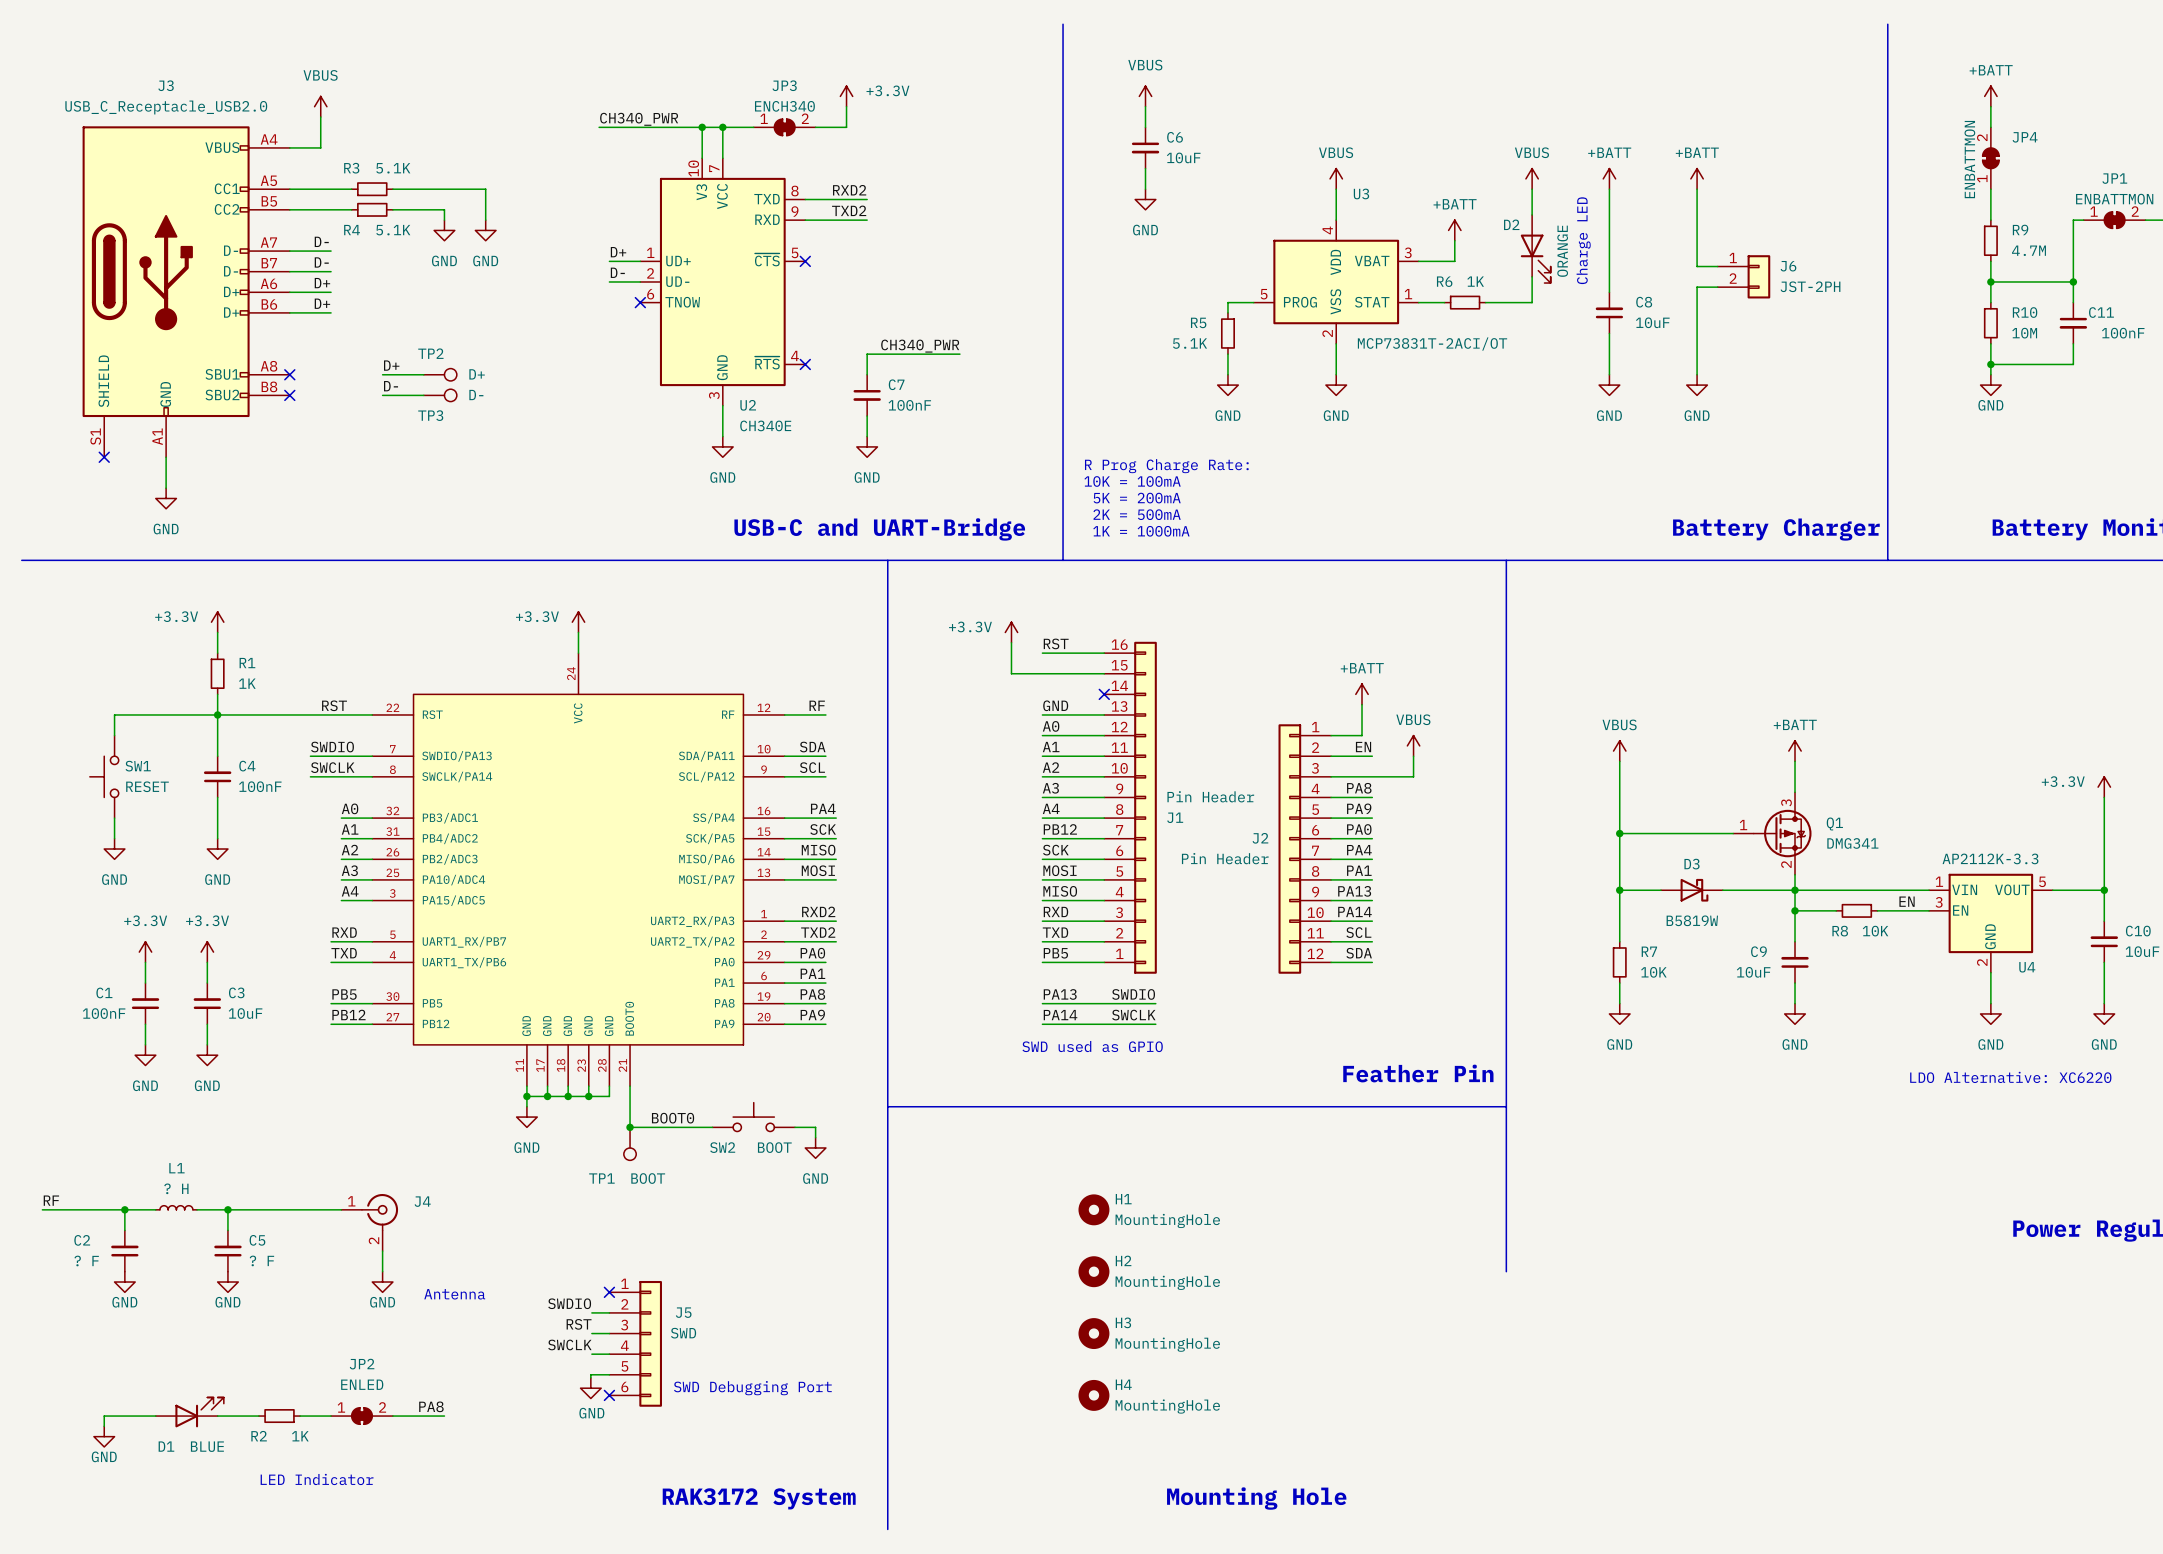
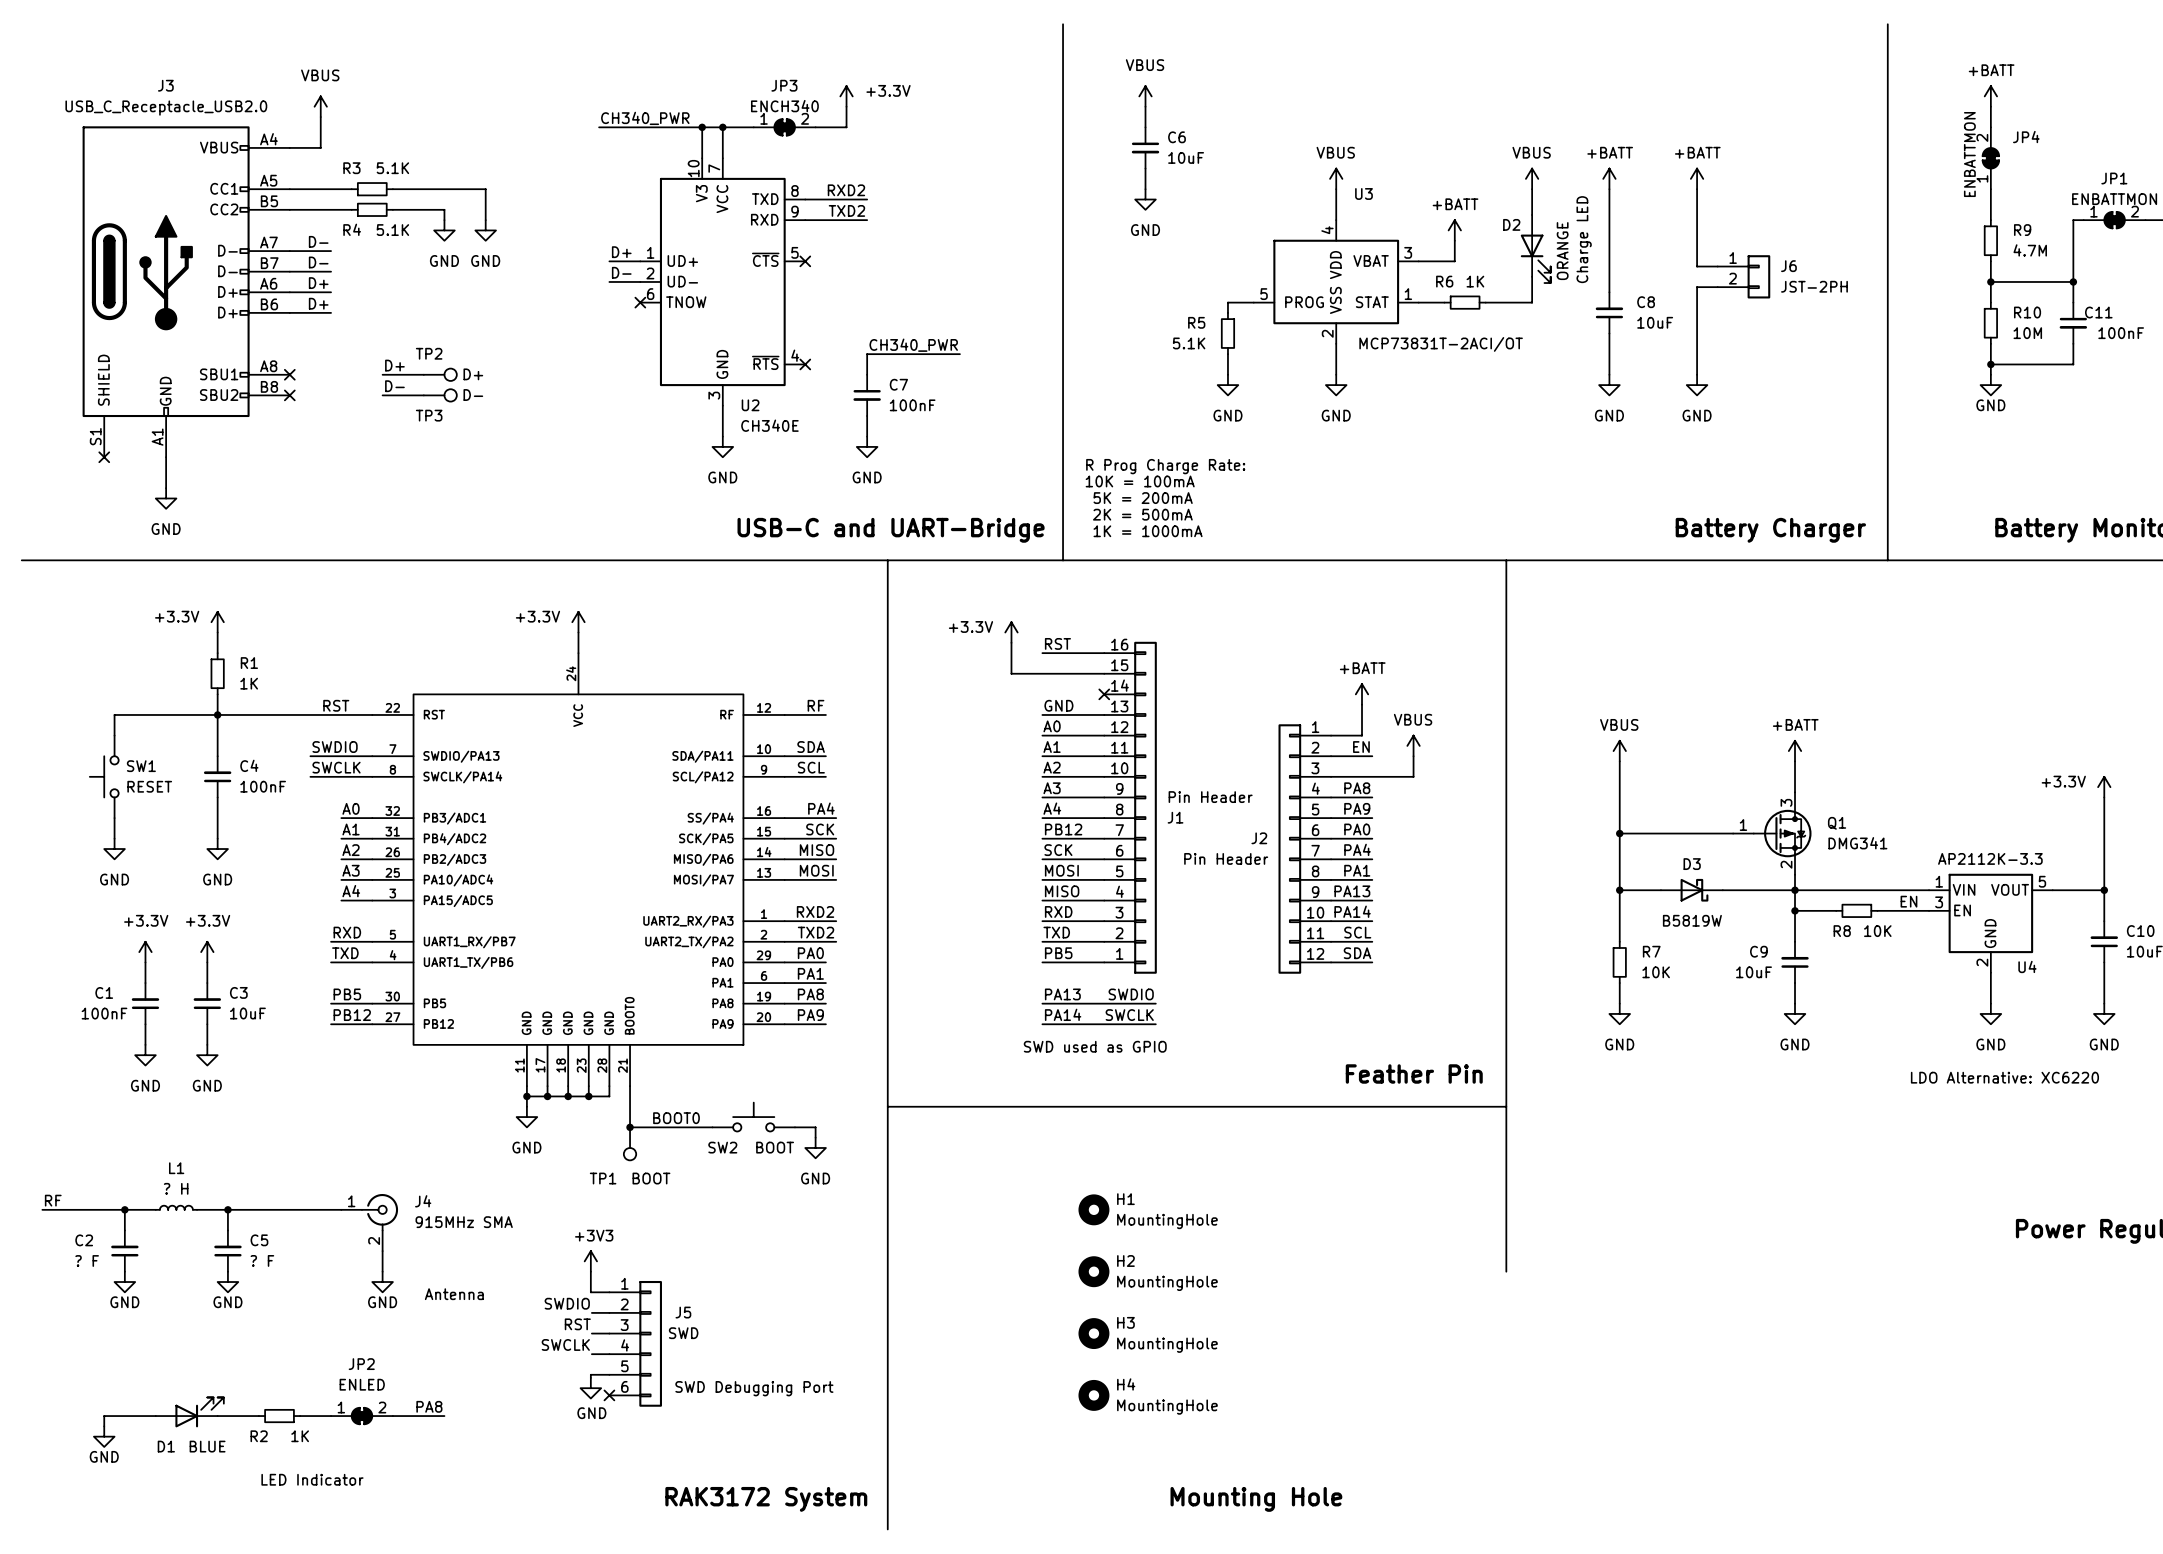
J4 value: none -> 915MHz SMA (464, 1222)
power symbol: none -> +3V3 (590, 1261)
wire: none -> (590, 1271) (590, 1292) (609, 1292)
no-connect mark: (609, 1292) -> none

